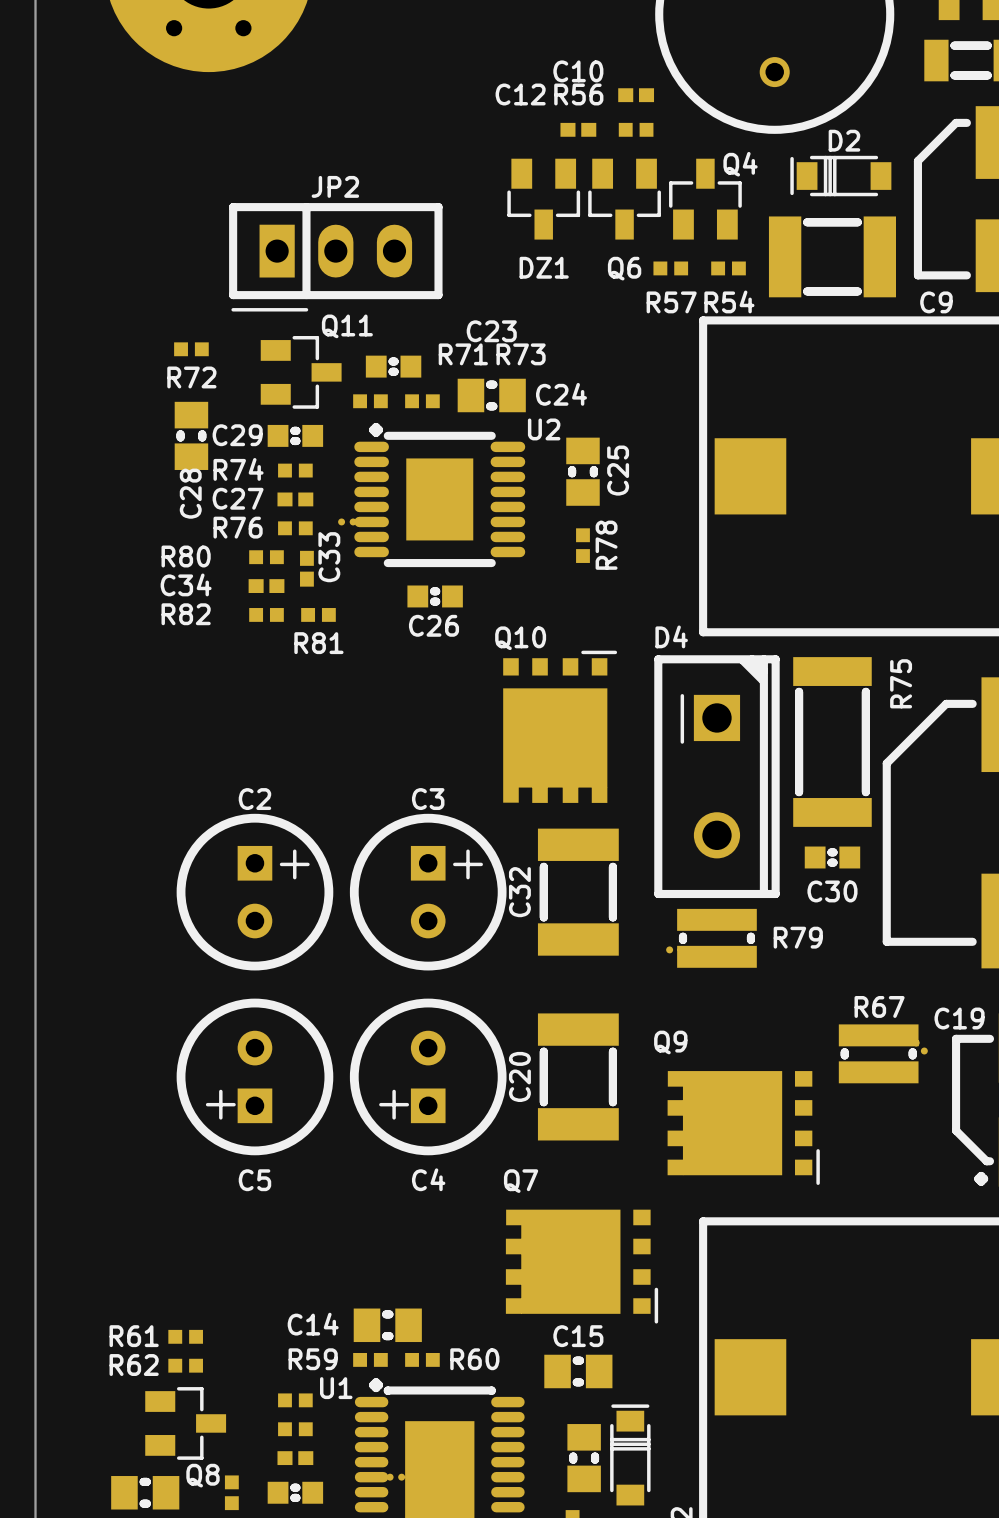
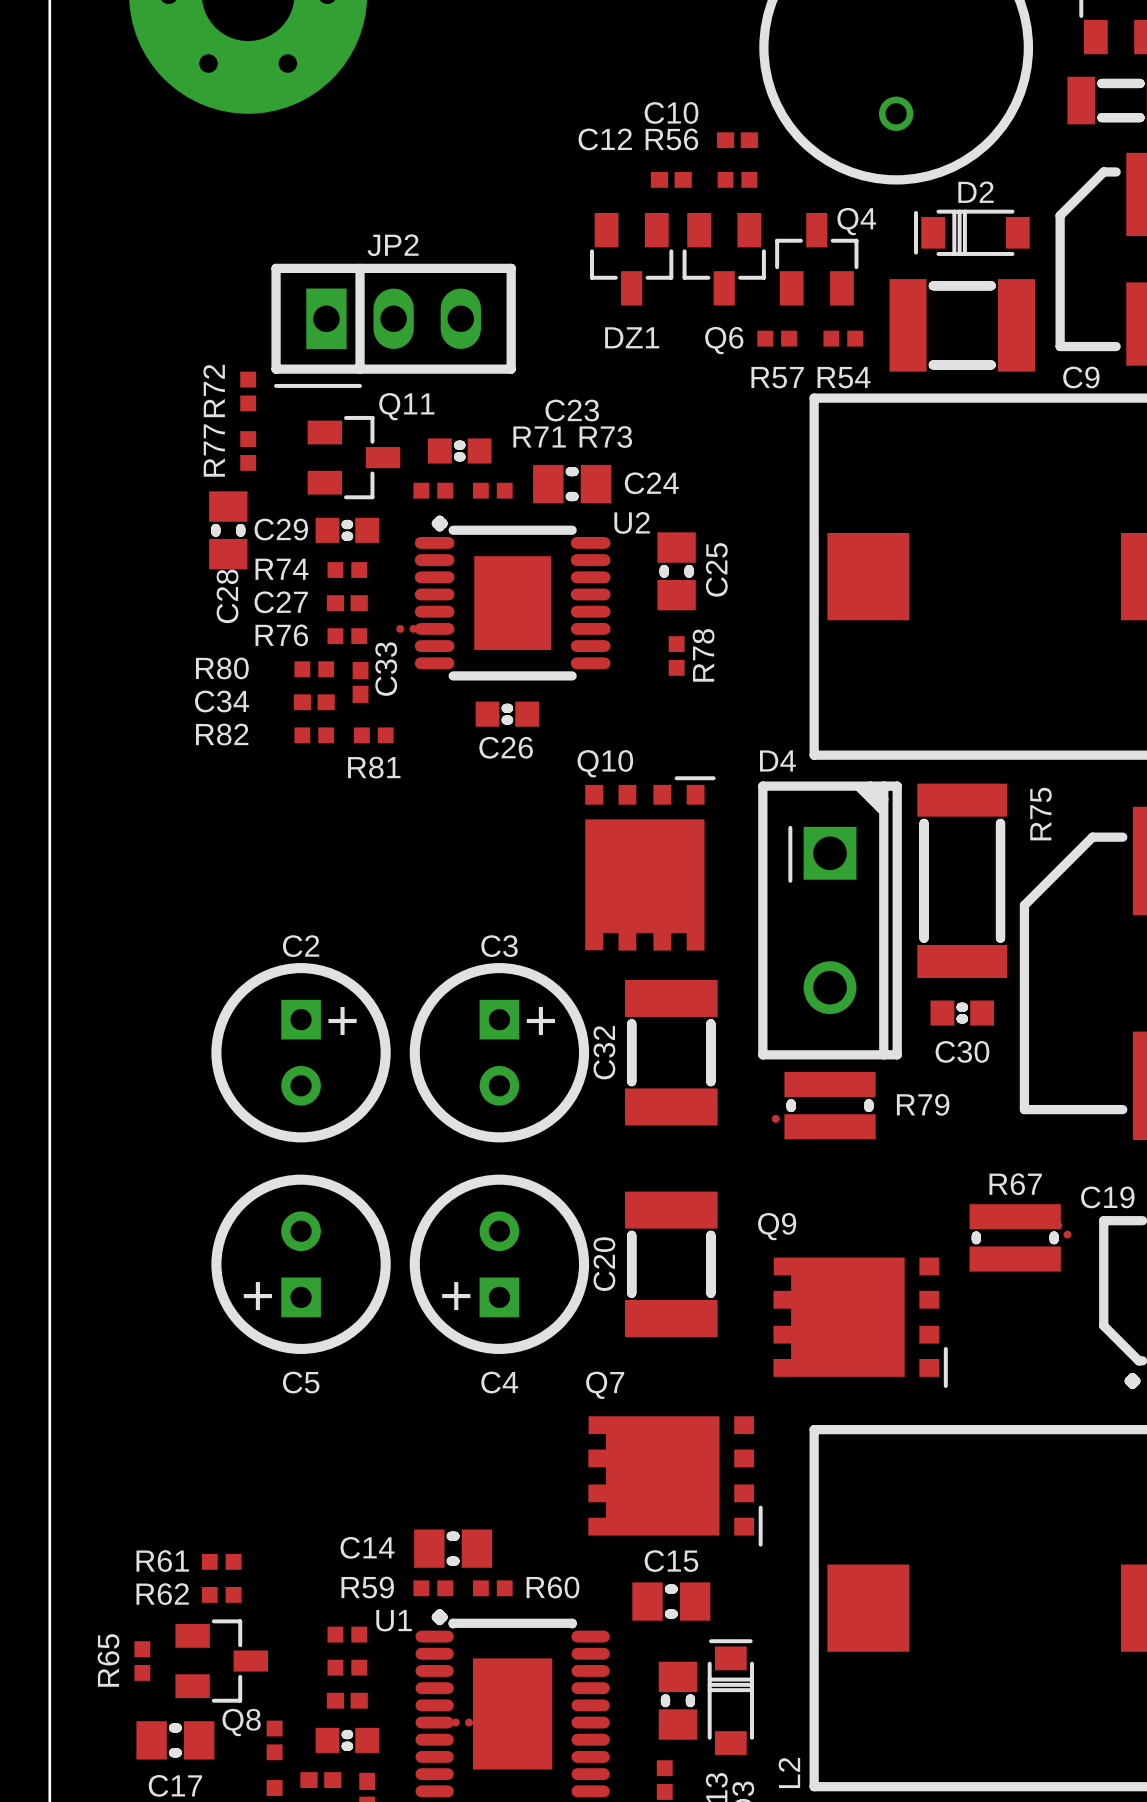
R72 rotation: 0° (191, 349) -> 90° clockwise (248, 391)
R72 position: (191, 349) -> (248, 391)
R77: none -> (248, 451)
R65: none -> (142, 1661)

